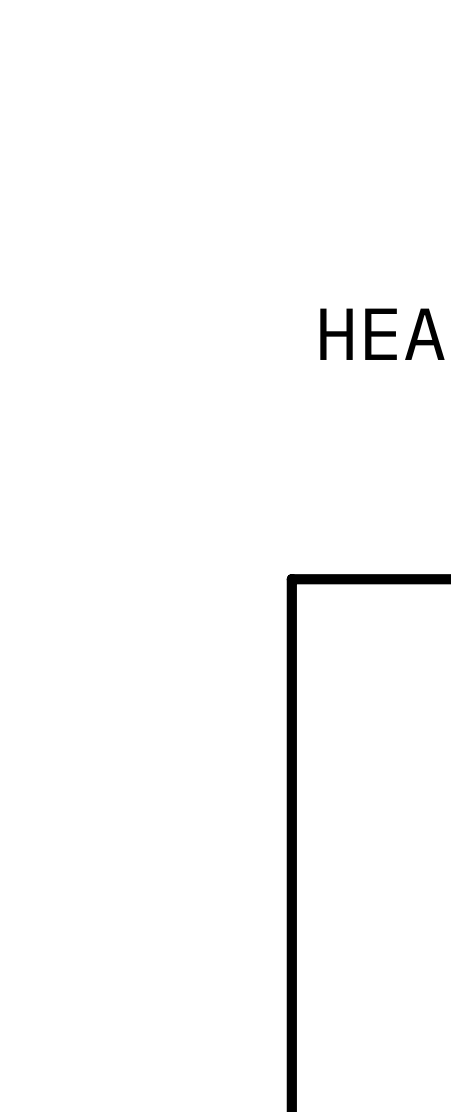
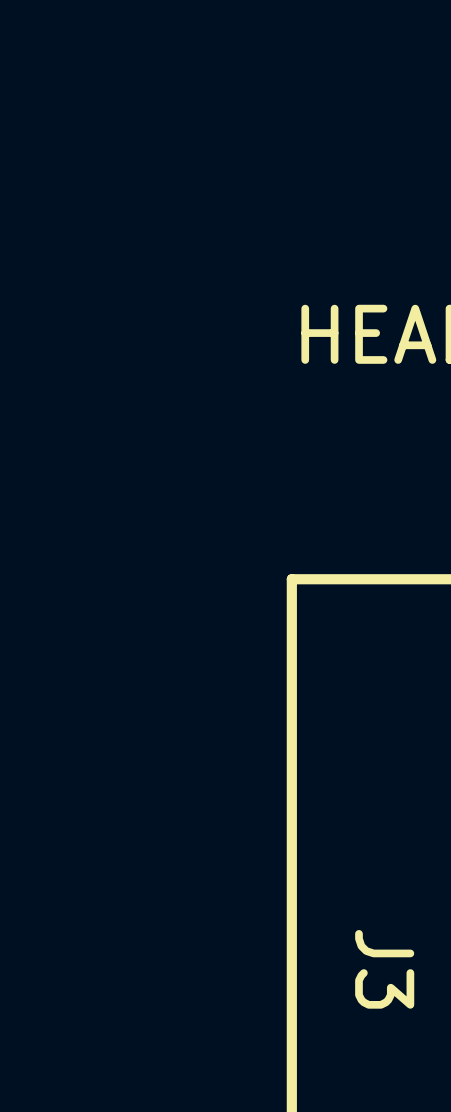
J3 name: none -> J3 (384, 969)

